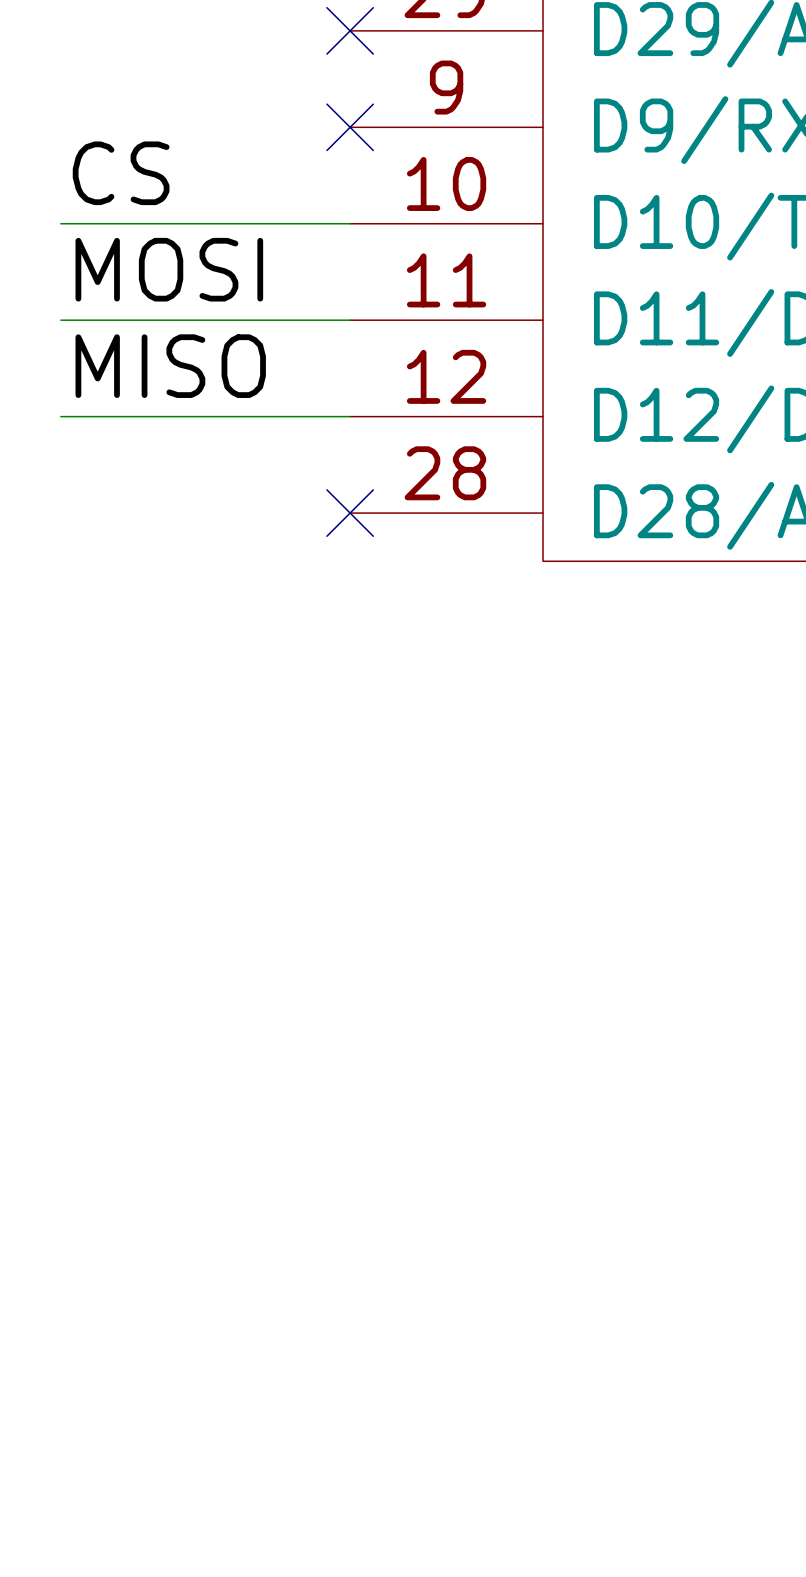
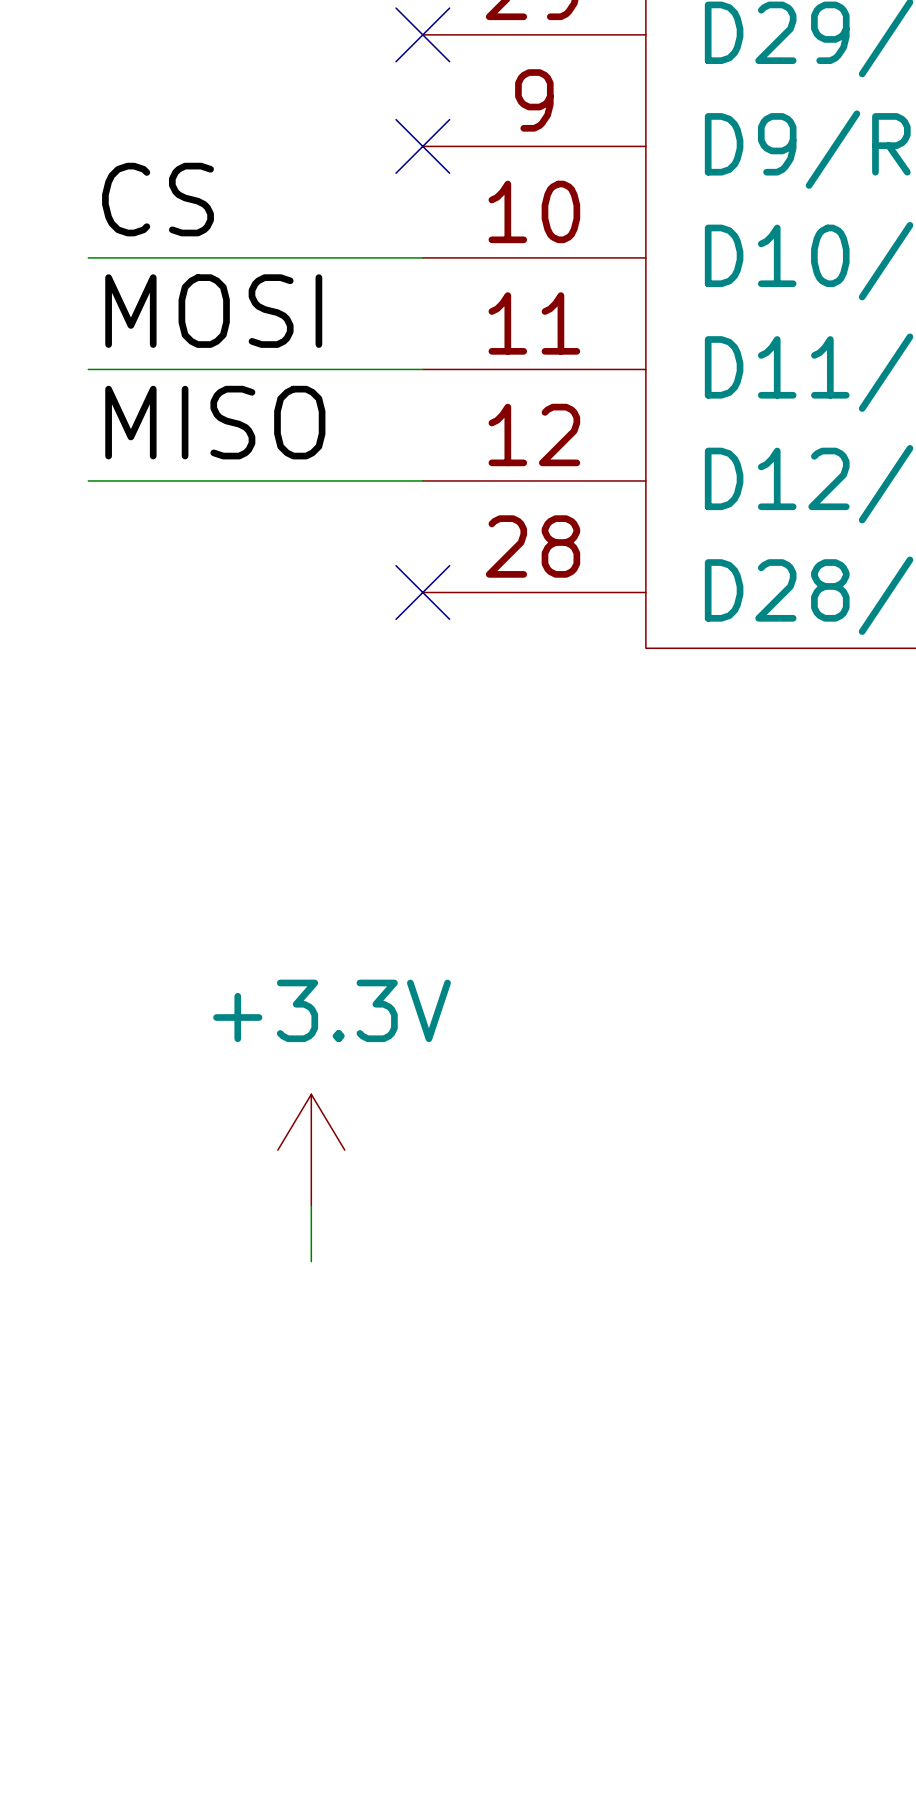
power symbol: none -> +3.3V (311, 1150)
wire: none -> (311, 1205) (311, 1261)

